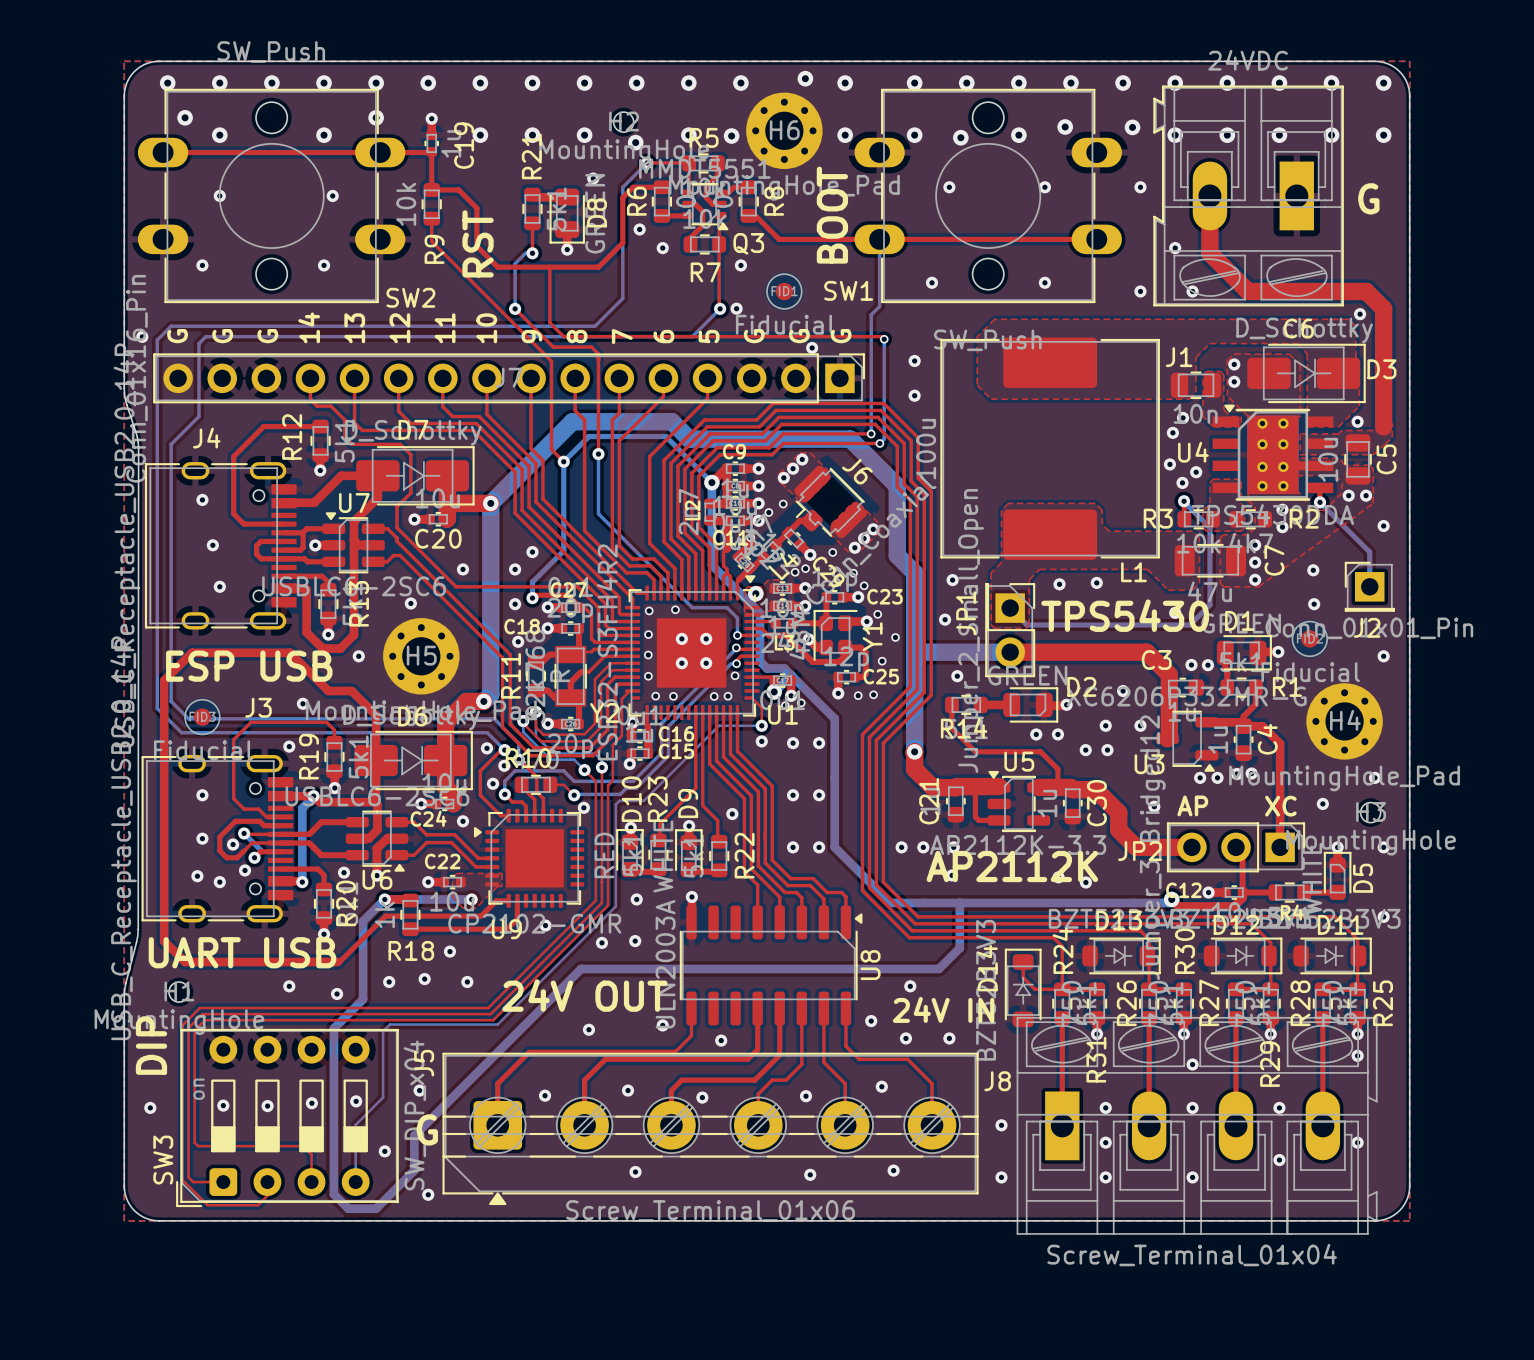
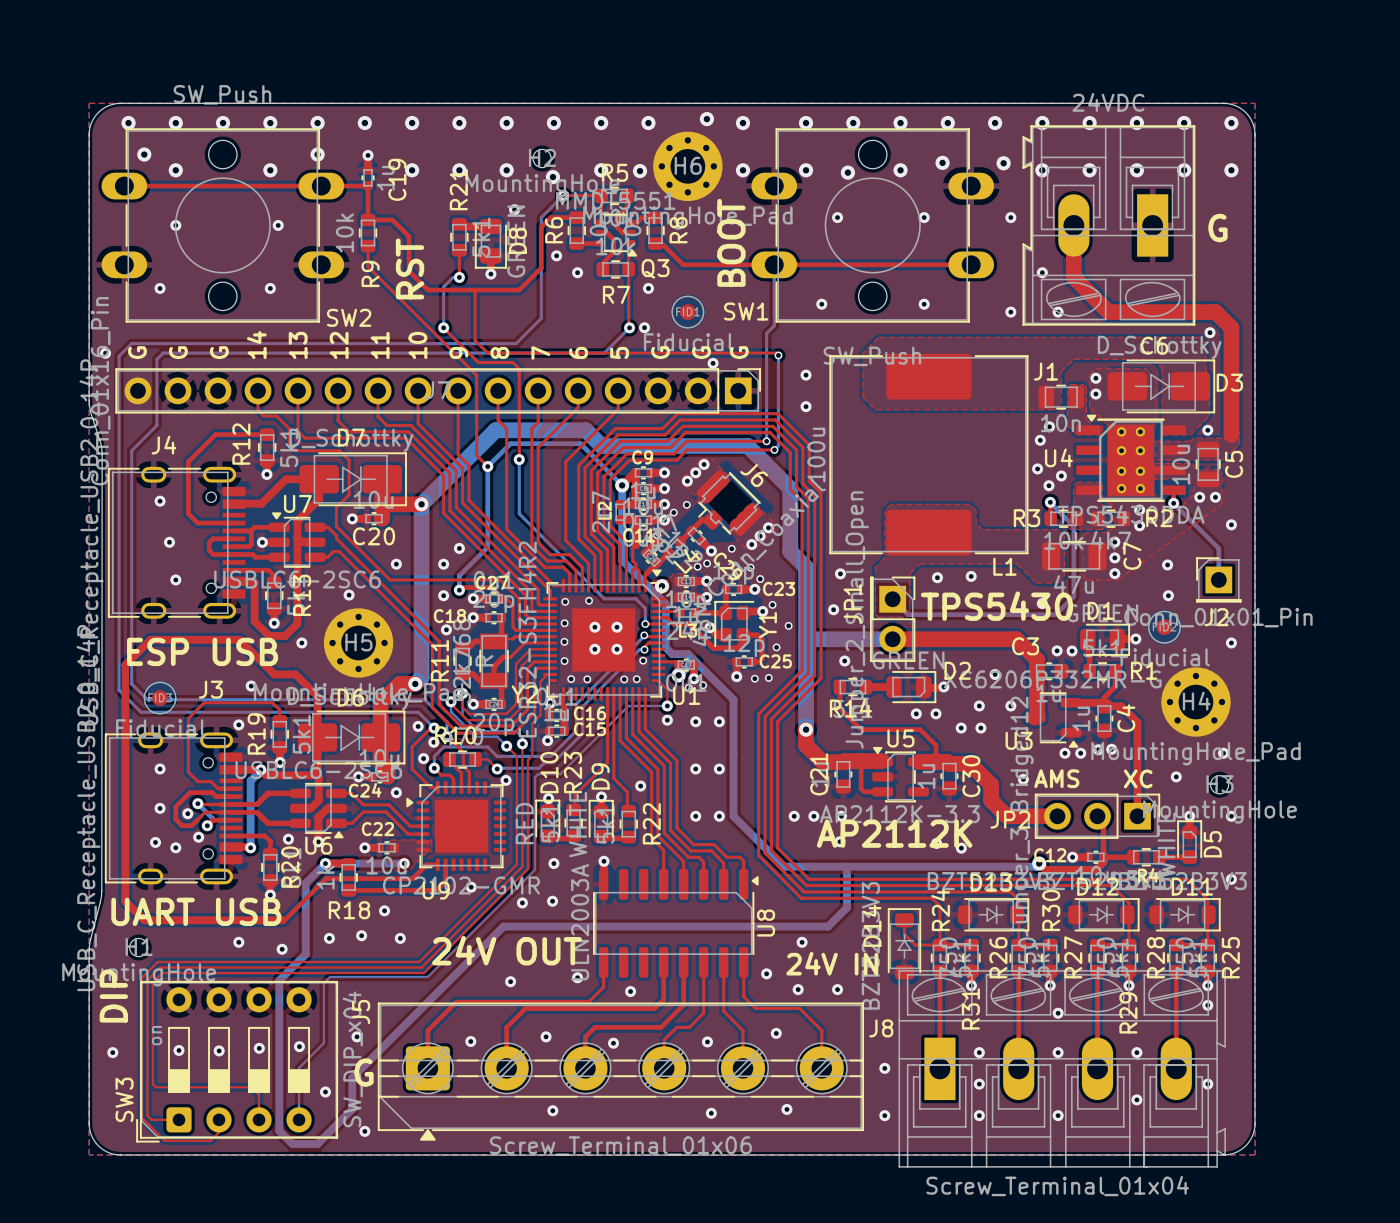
text: AP (1192, 805) -> AMS (1056, 778)

